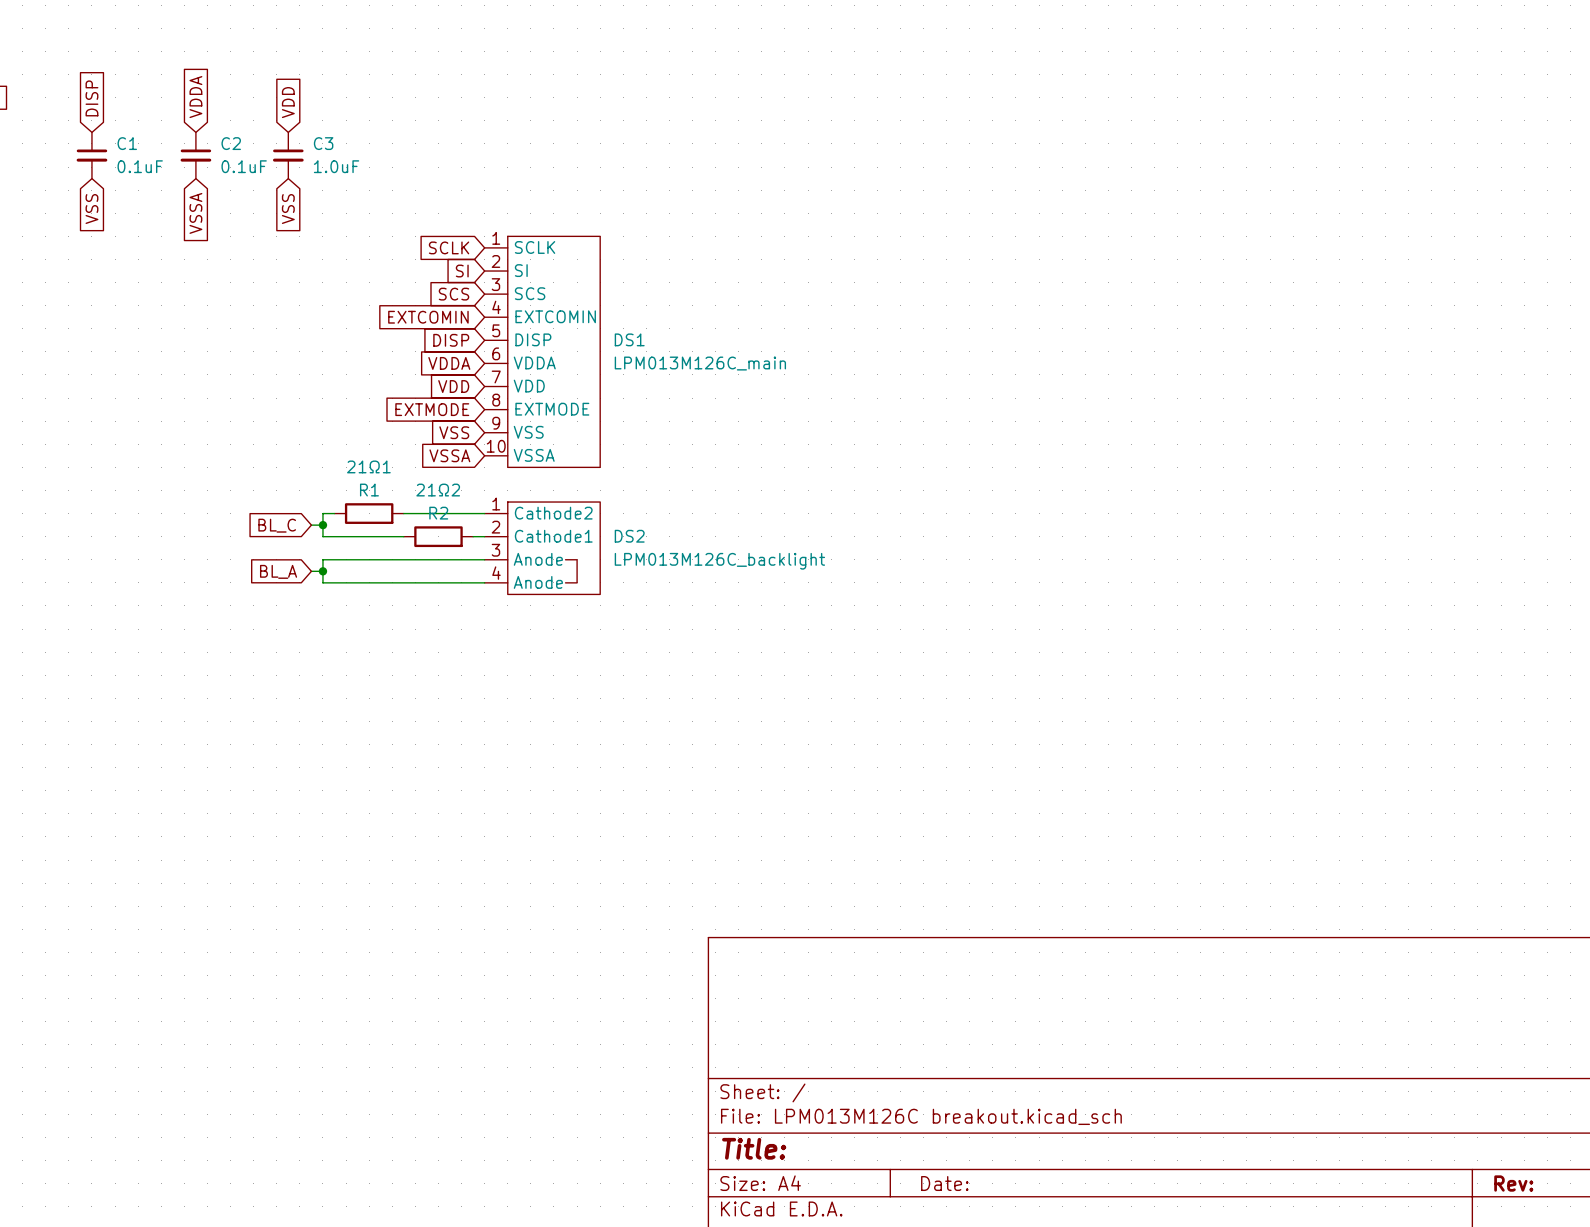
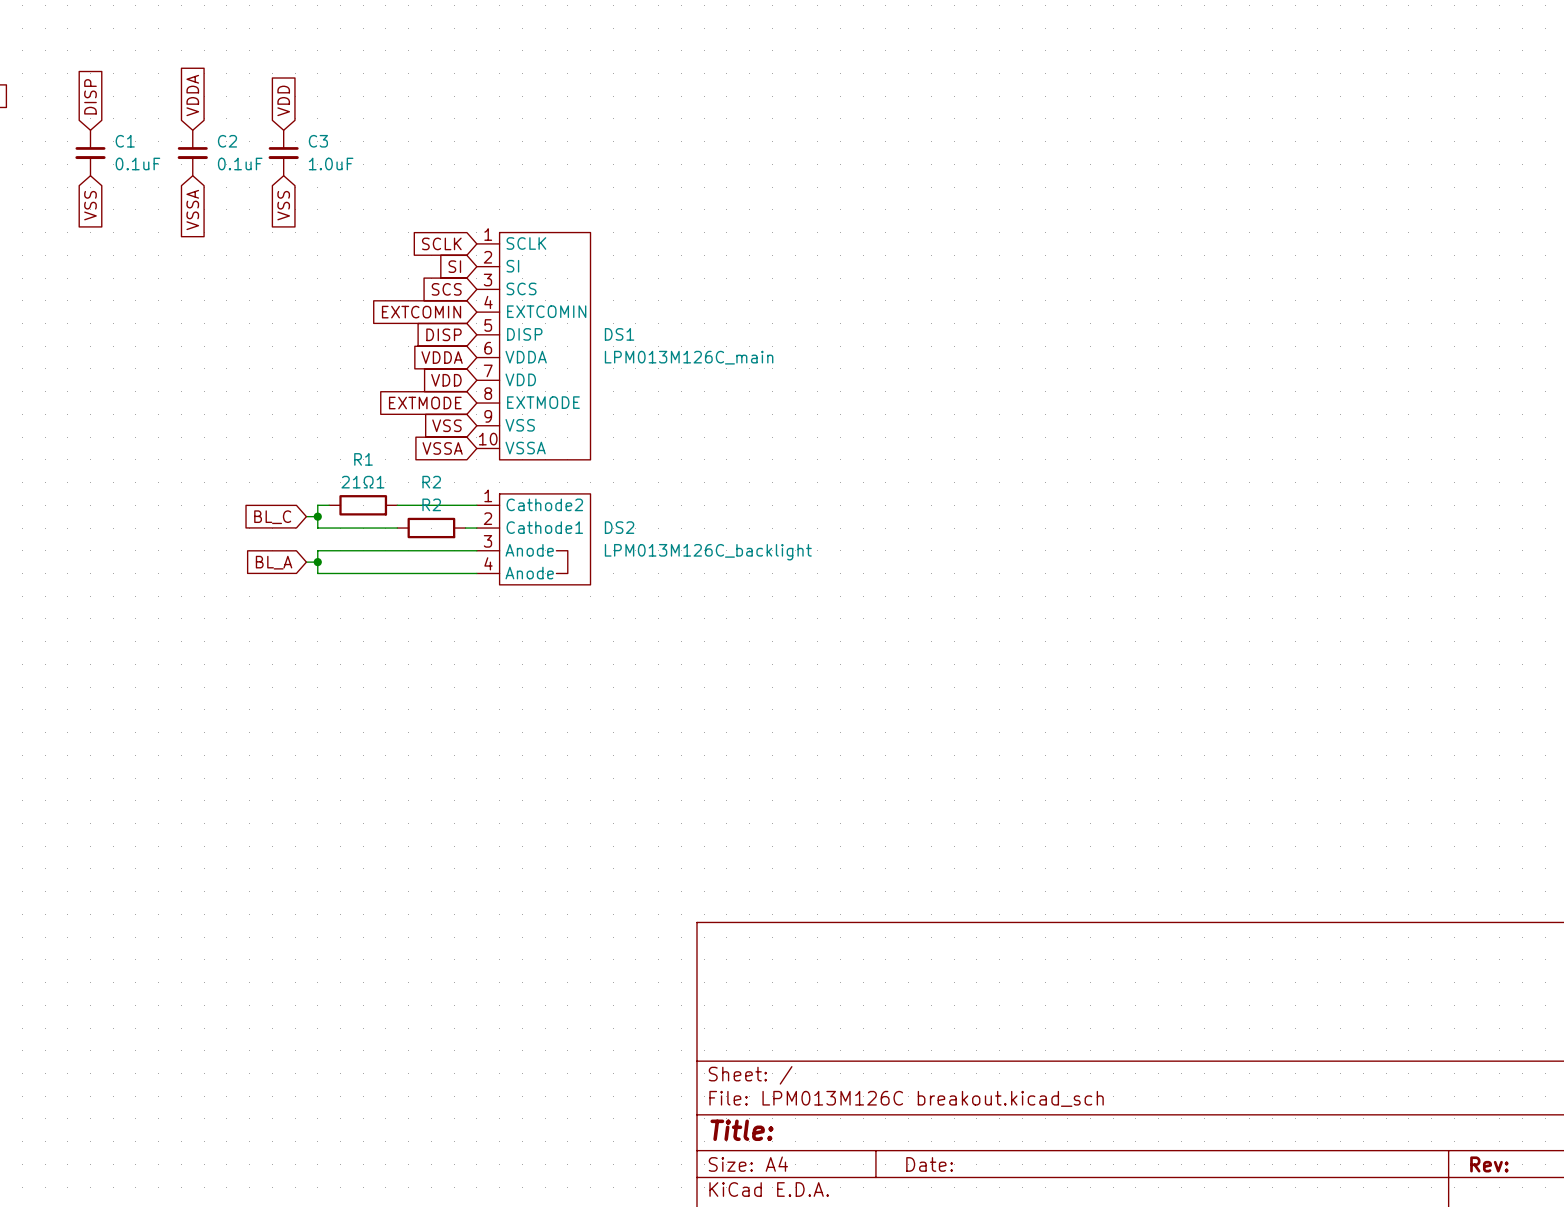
21Ω1 name: 21Ω1 (368, 466) -> R1 (363, 459)
21Ω1 value: R1 (369, 490) -> 21Ω1 (362, 482)
21Ω2 name: 21Ω2 (438, 490) -> R2 (431, 482)

